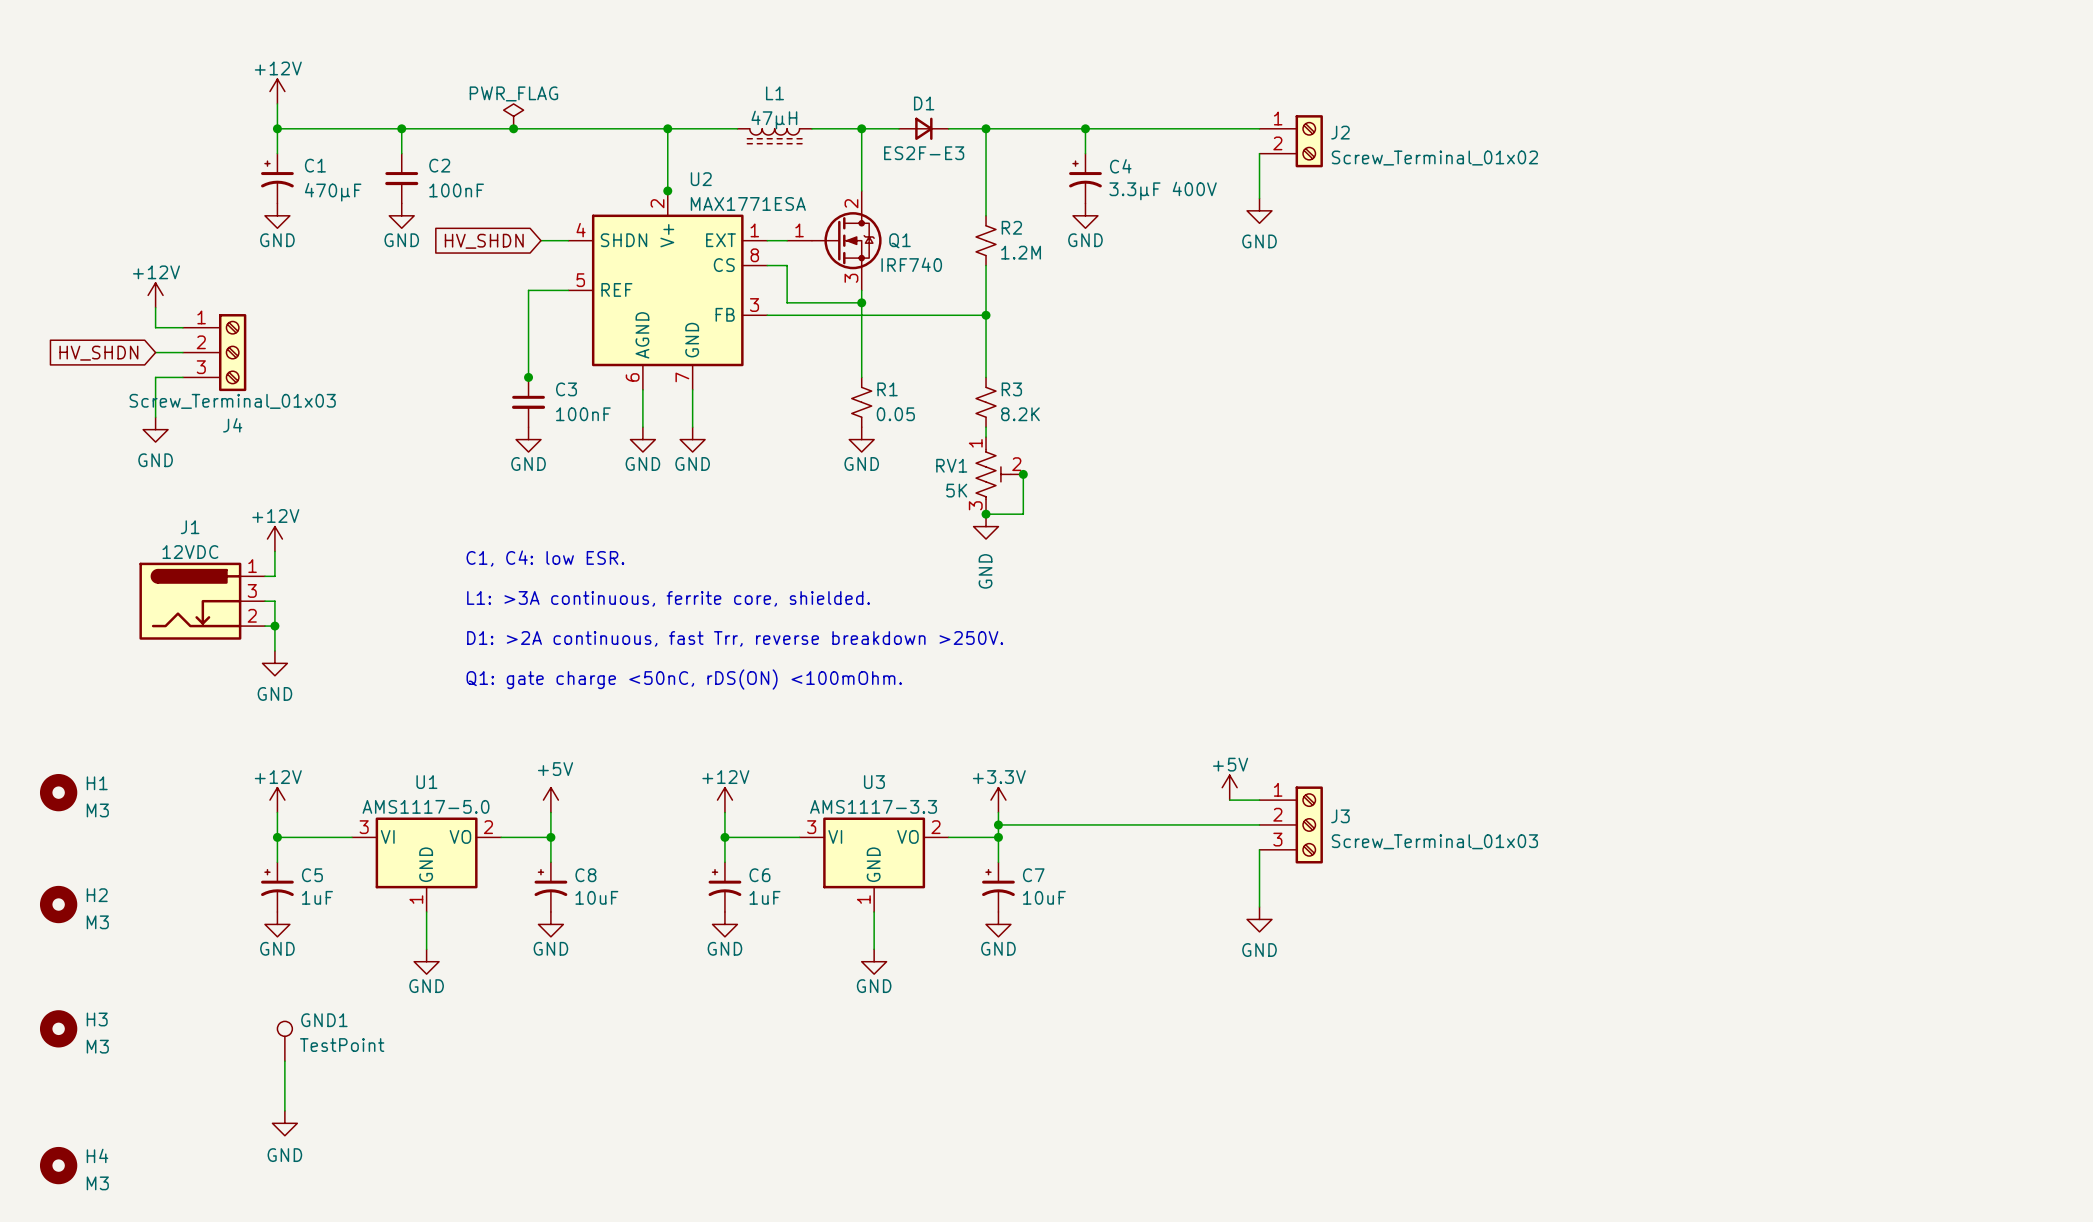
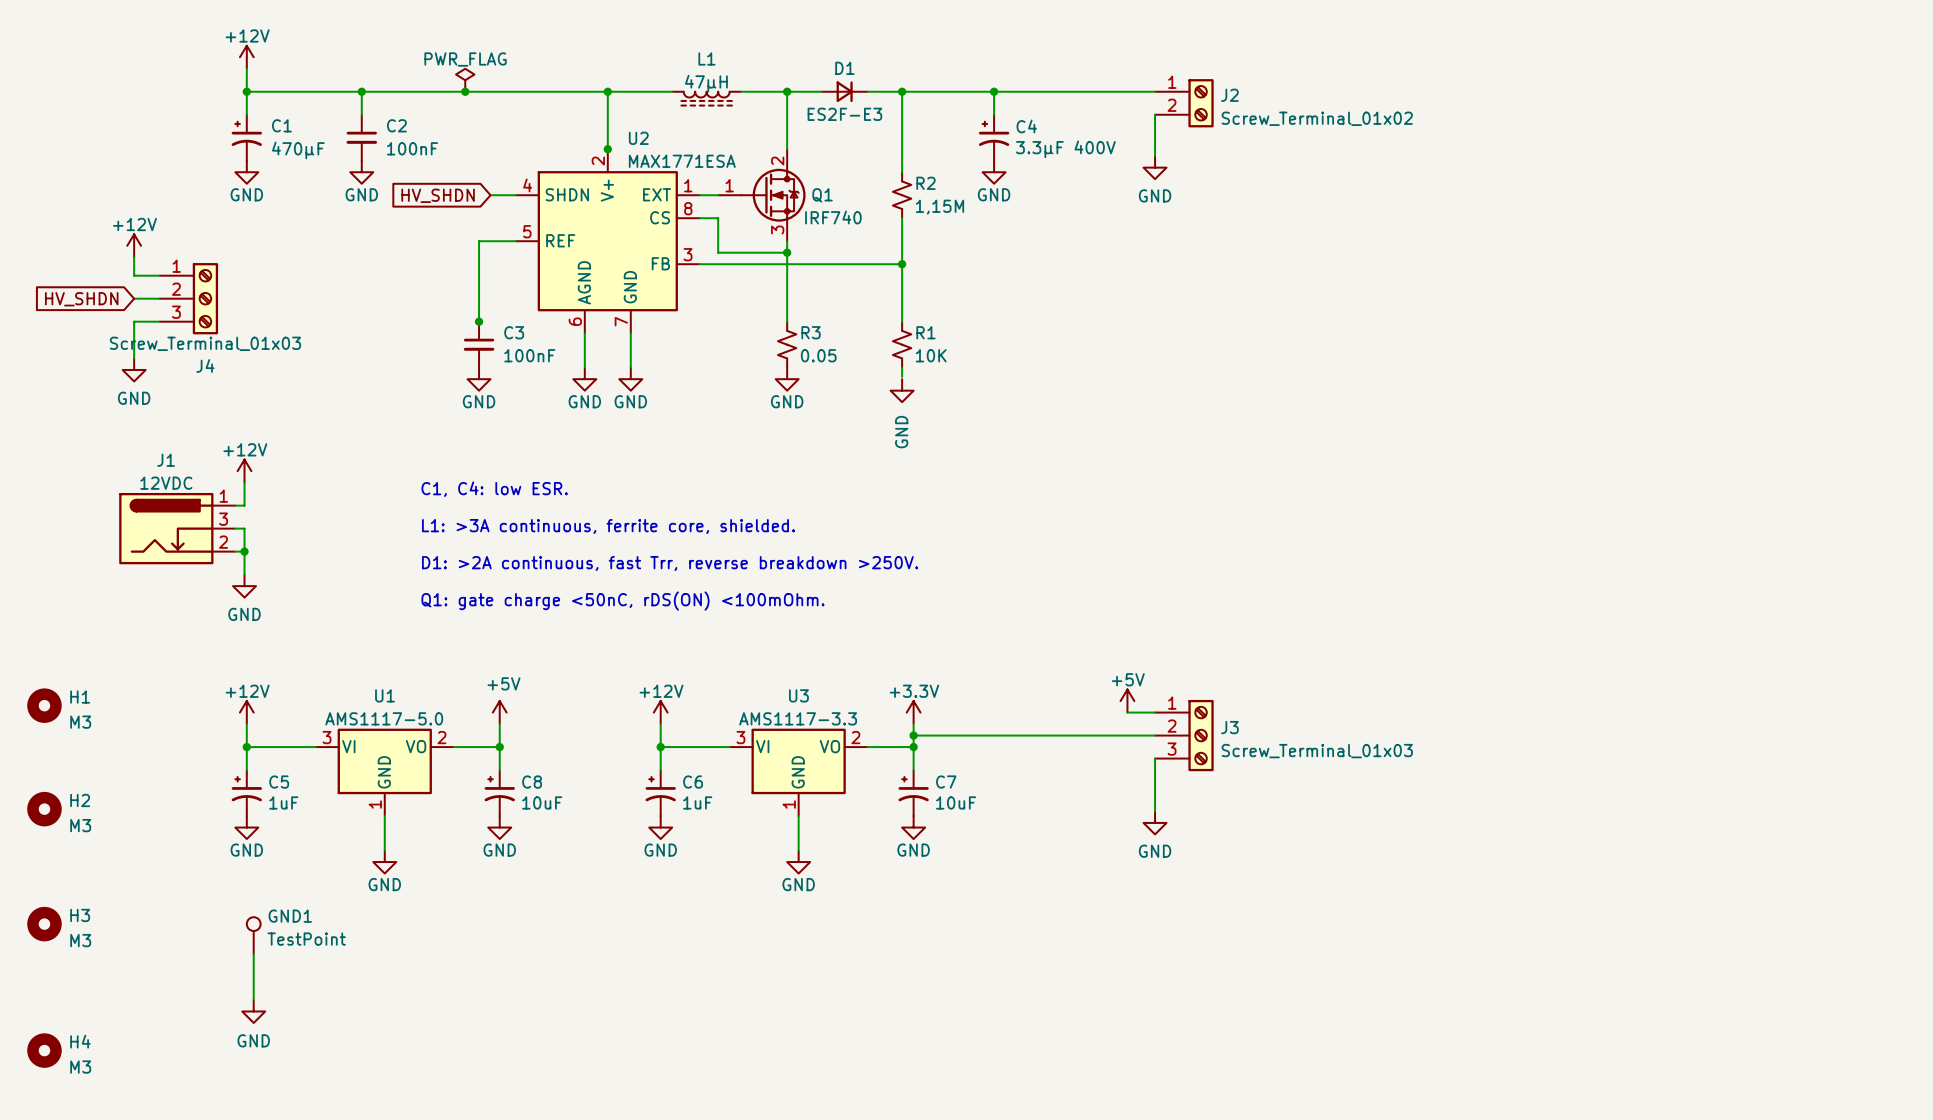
R2 value: 1.2M (1021, 252) -> 1,15M (939, 207)
R1 name: R1 (887, 389) -> R3 (811, 332)
R3 name: R3 (1011, 389) -> R1 (926, 332)
R3 value: 8.2K (1020, 414) -> 10K (931, 355)
RV1: 5K (999, 474) -> none
junction: (1023, 474) -> none
wire: (1025, 474) (1023, 474) (1023, 514) (986, 514) (986, 511) -> none
junction: (986, 514) -> none
power symbol position: GND (986, 526) -> GND (902, 390)

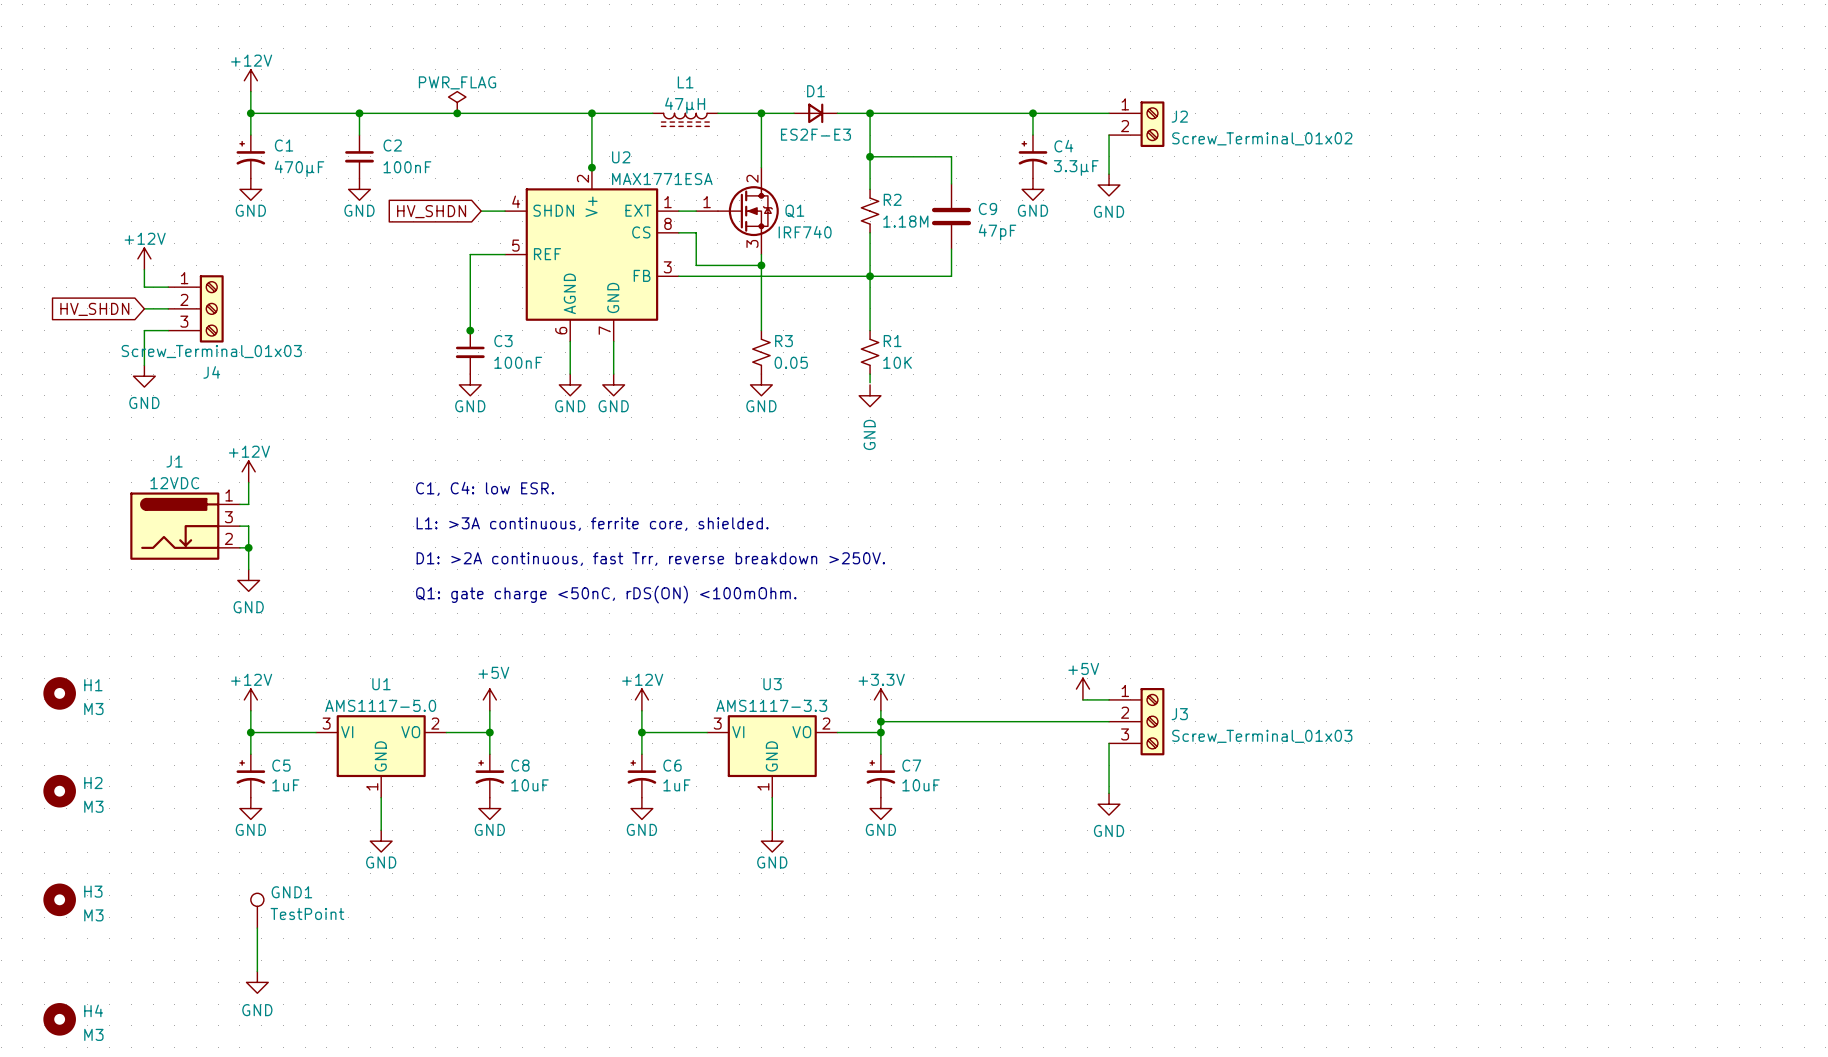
wire: (994, 91) (994, 114) -> (1032, 113) (1032, 135)
junction: (994, 91) -> none
junction: none -> (1032, 113)
wire: none -> (870, 156) (951, 156) (951, 183)
junction: none -> (870, 156)
C4 position: (994, 137) -> (1032, 156)
C4 value: 3.3µF 400V (1065, 149) -> 3.3µF (1076, 167)
power symbol position: GND (994, 172) -> GND (1032, 189)
C9: none -> 47pF (951, 216)
R2 value: 1,15M (939, 207) -> 1.18M (905, 221)
wire: none -> (951, 249) (951, 276) (870, 276)

